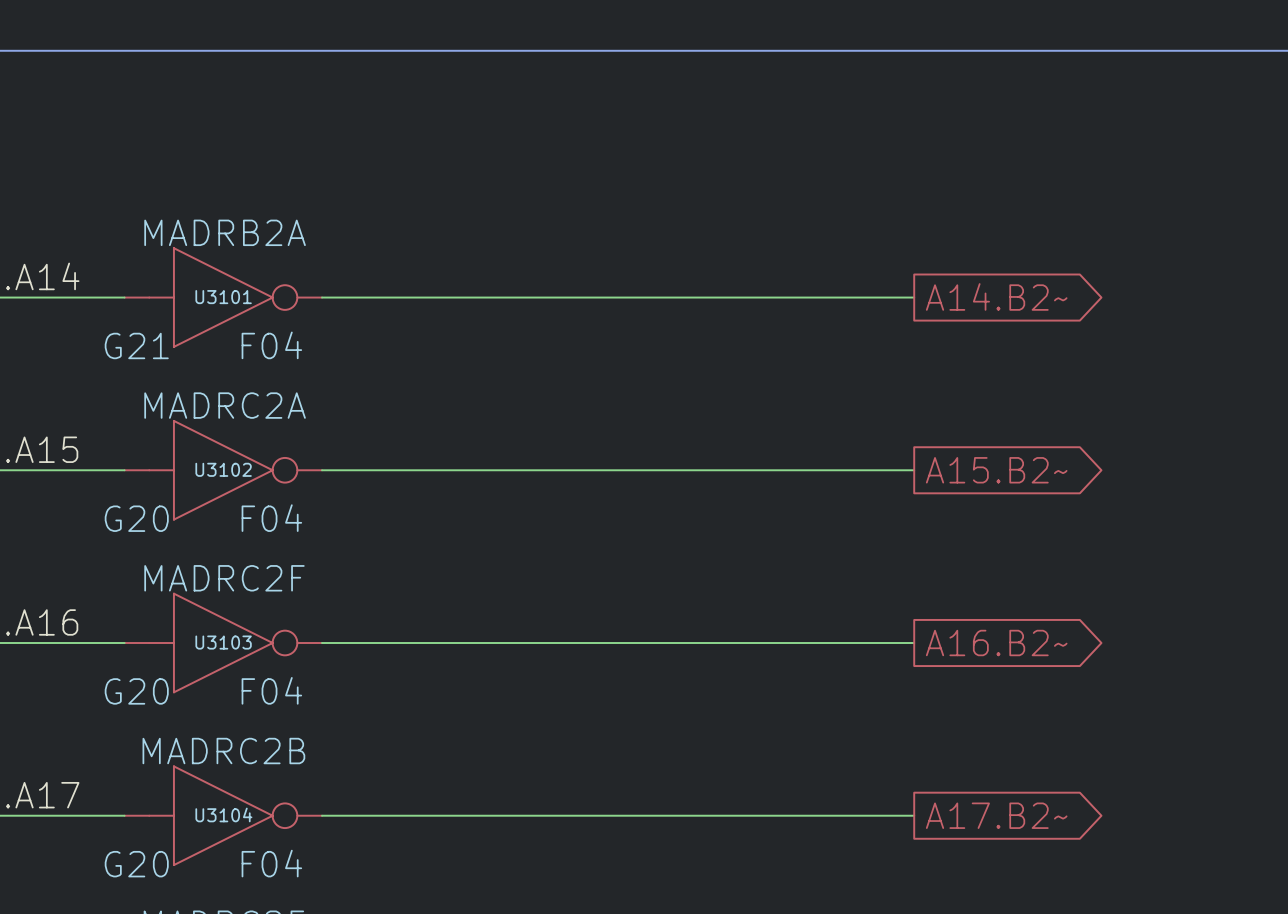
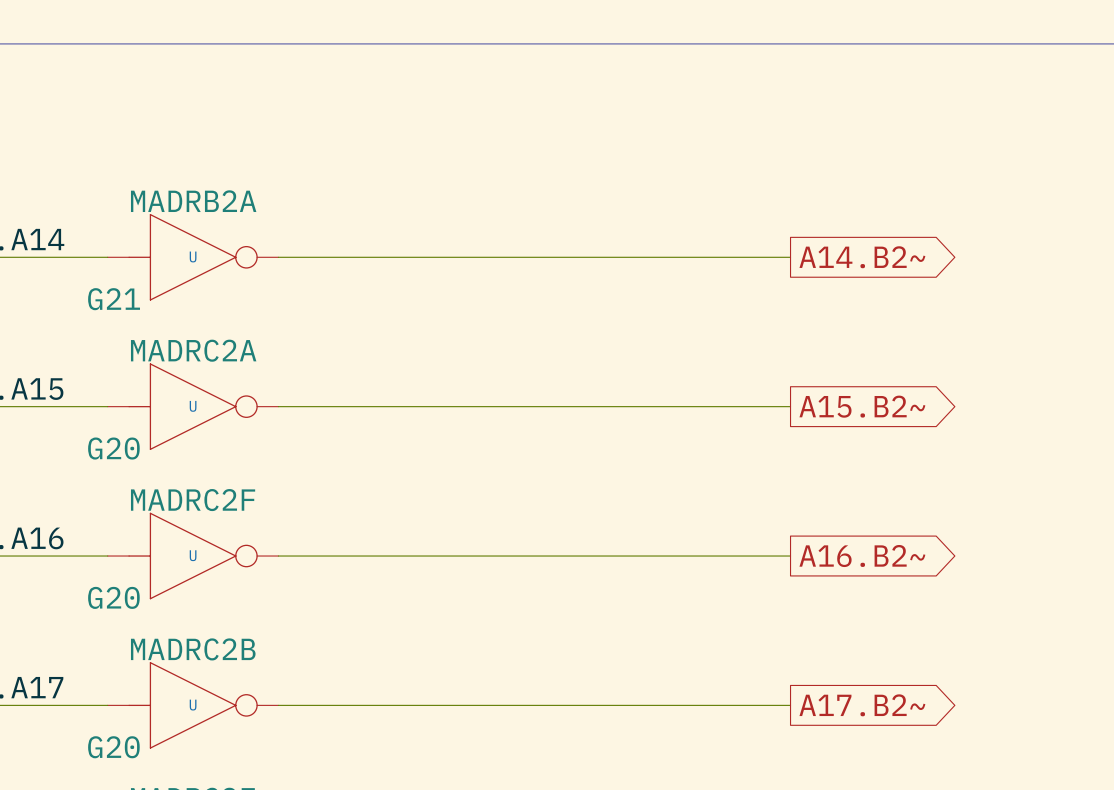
U3101 name: U3101 (223, 297) -> U (193, 256)
U3101 value: F04 (271, 345) -> none
U3102 name: U3102 (223, 469) -> U (193, 406)
U3102 value: F04 (271, 518) -> none
U3103 name: U3103 (223, 642) -> U (193, 555)
U3103 value: F04 (271, 690) -> none
U3104 name: U3104 (223, 814) -> U (193, 705)
U3104 value: F04 (271, 863) -> none

